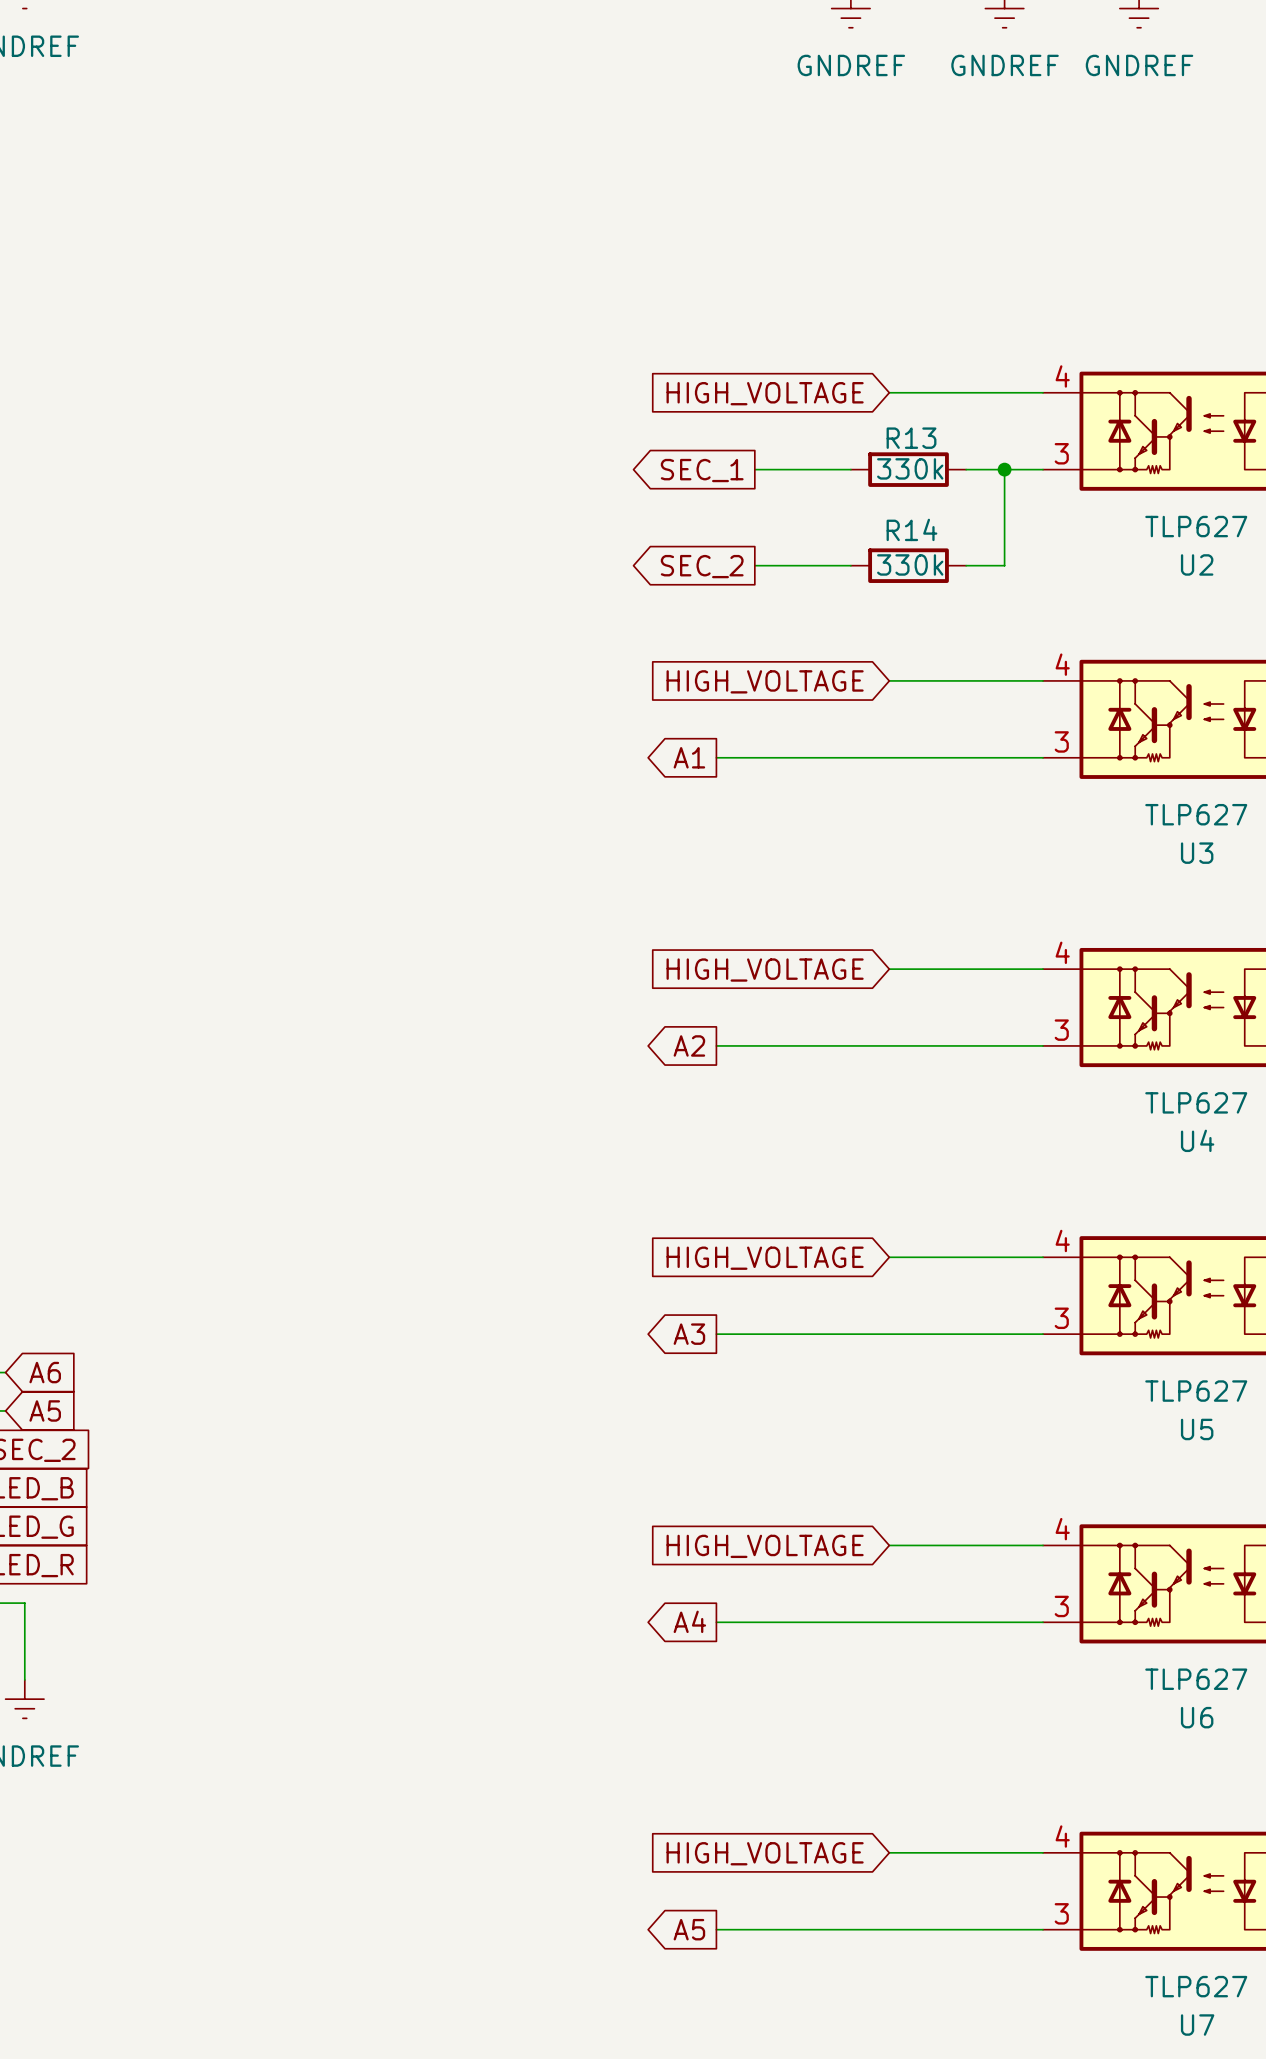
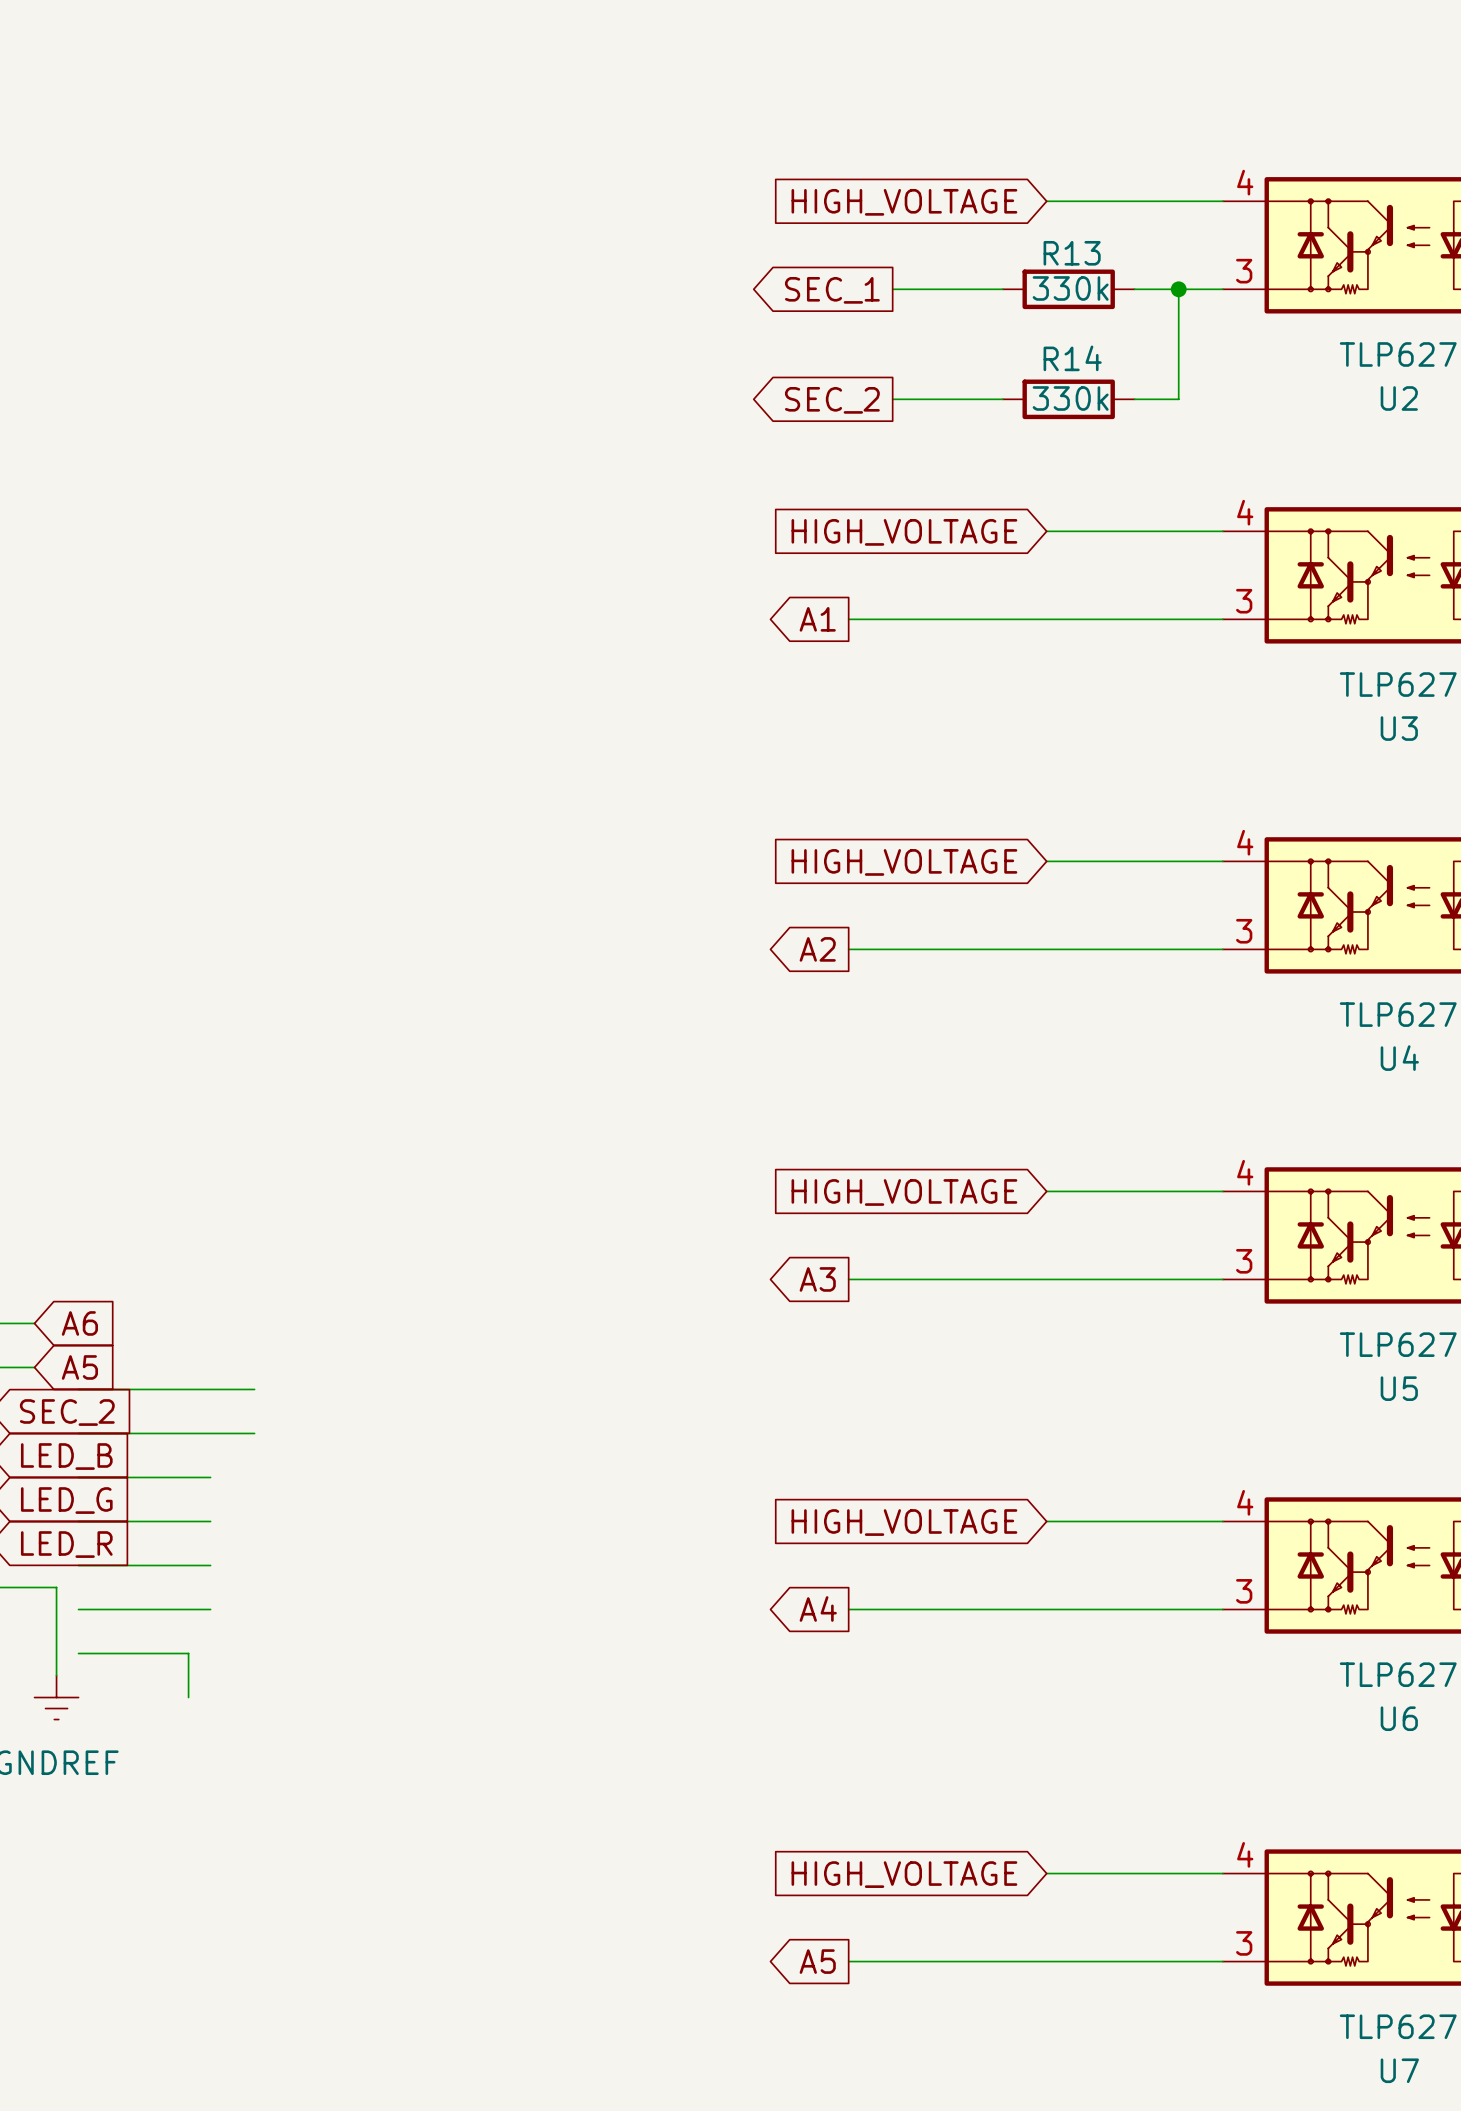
wire: none -> (78, 1389) (254, 1389)
wire: none -> (78, 1433) (254, 1433)
wire: none -> (78, 1477) (210, 1477)
wire: none -> (78, 1521) (210, 1521)
wire: none -> (78, 1565) (210, 1565)
wire: none -> (78, 1609) (210, 1609)
wire: none -> (78, 1653) (188, 1653) (188, 1697)

